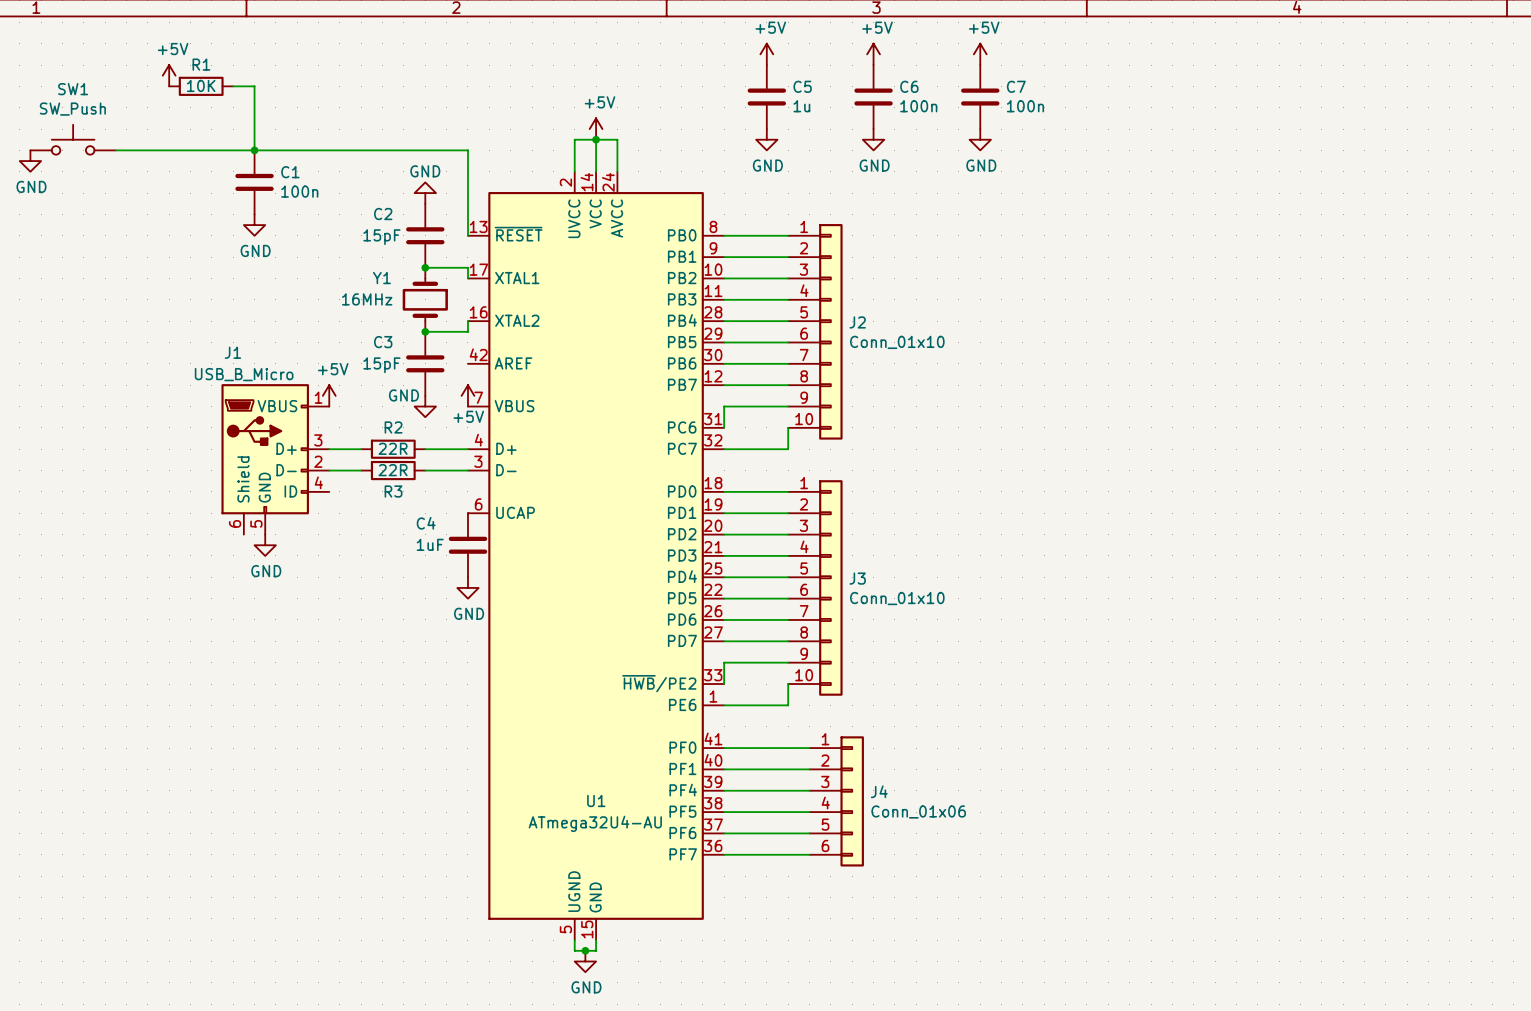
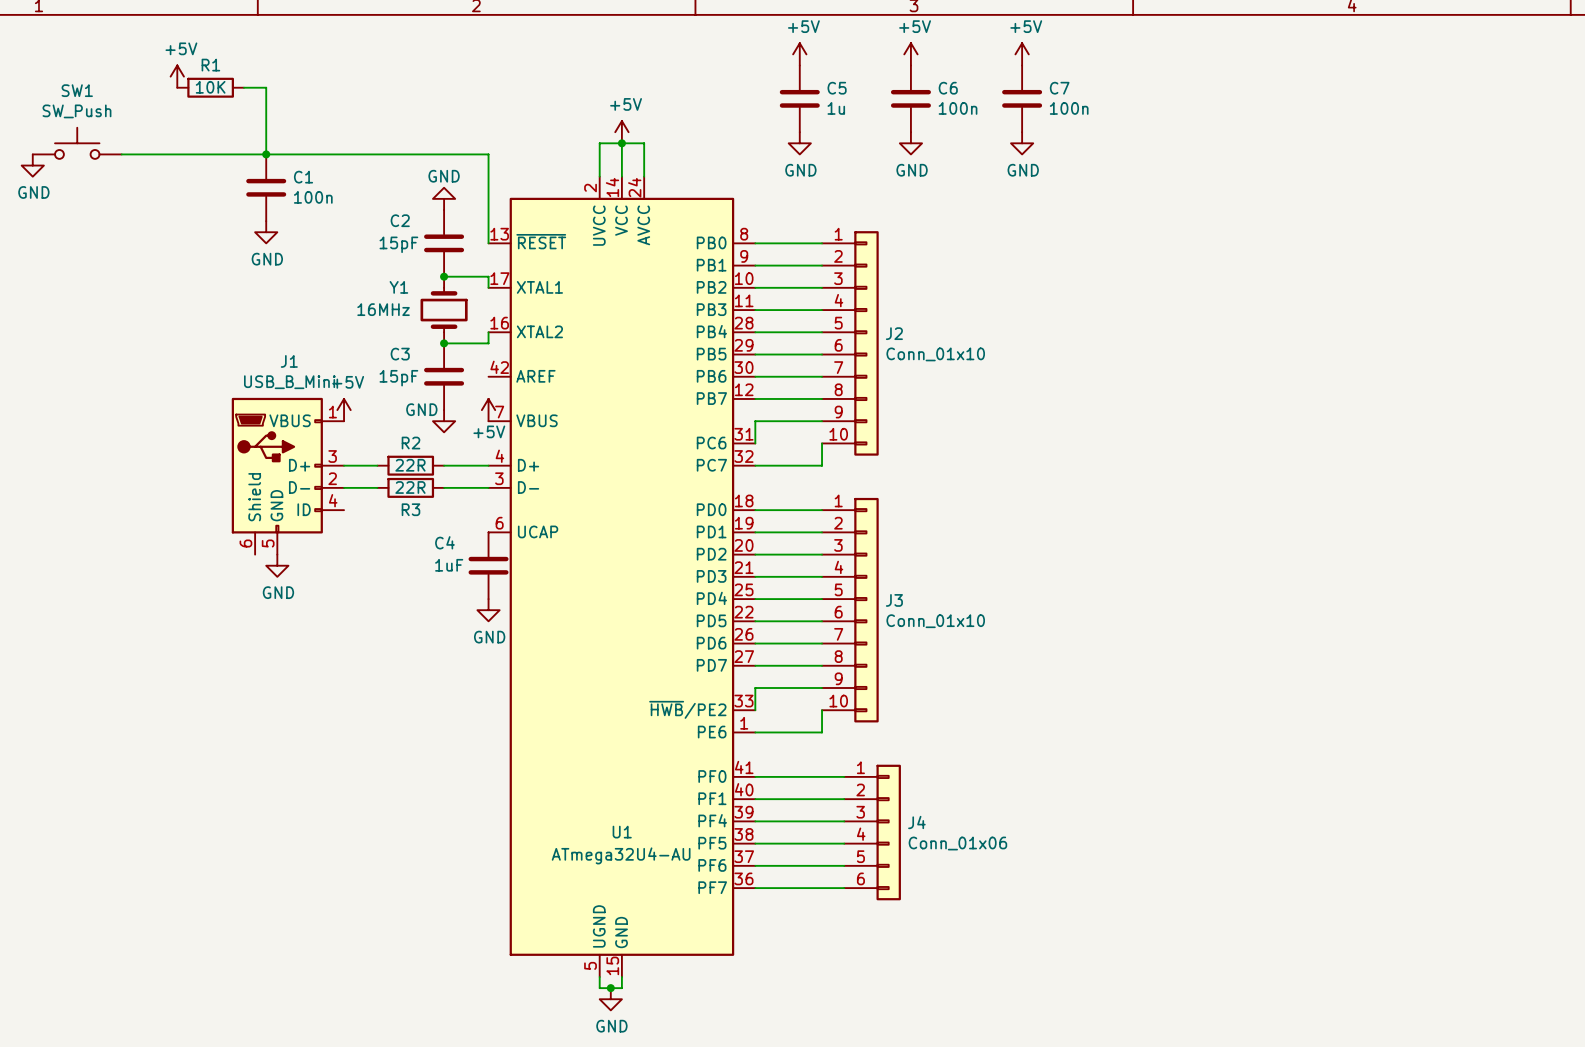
J1 name position: J1 (232, 352) -> J1 (289, 361)
J1 value: USB_B_Micro (244, 374) -> USB_B_Mini (289, 382)

